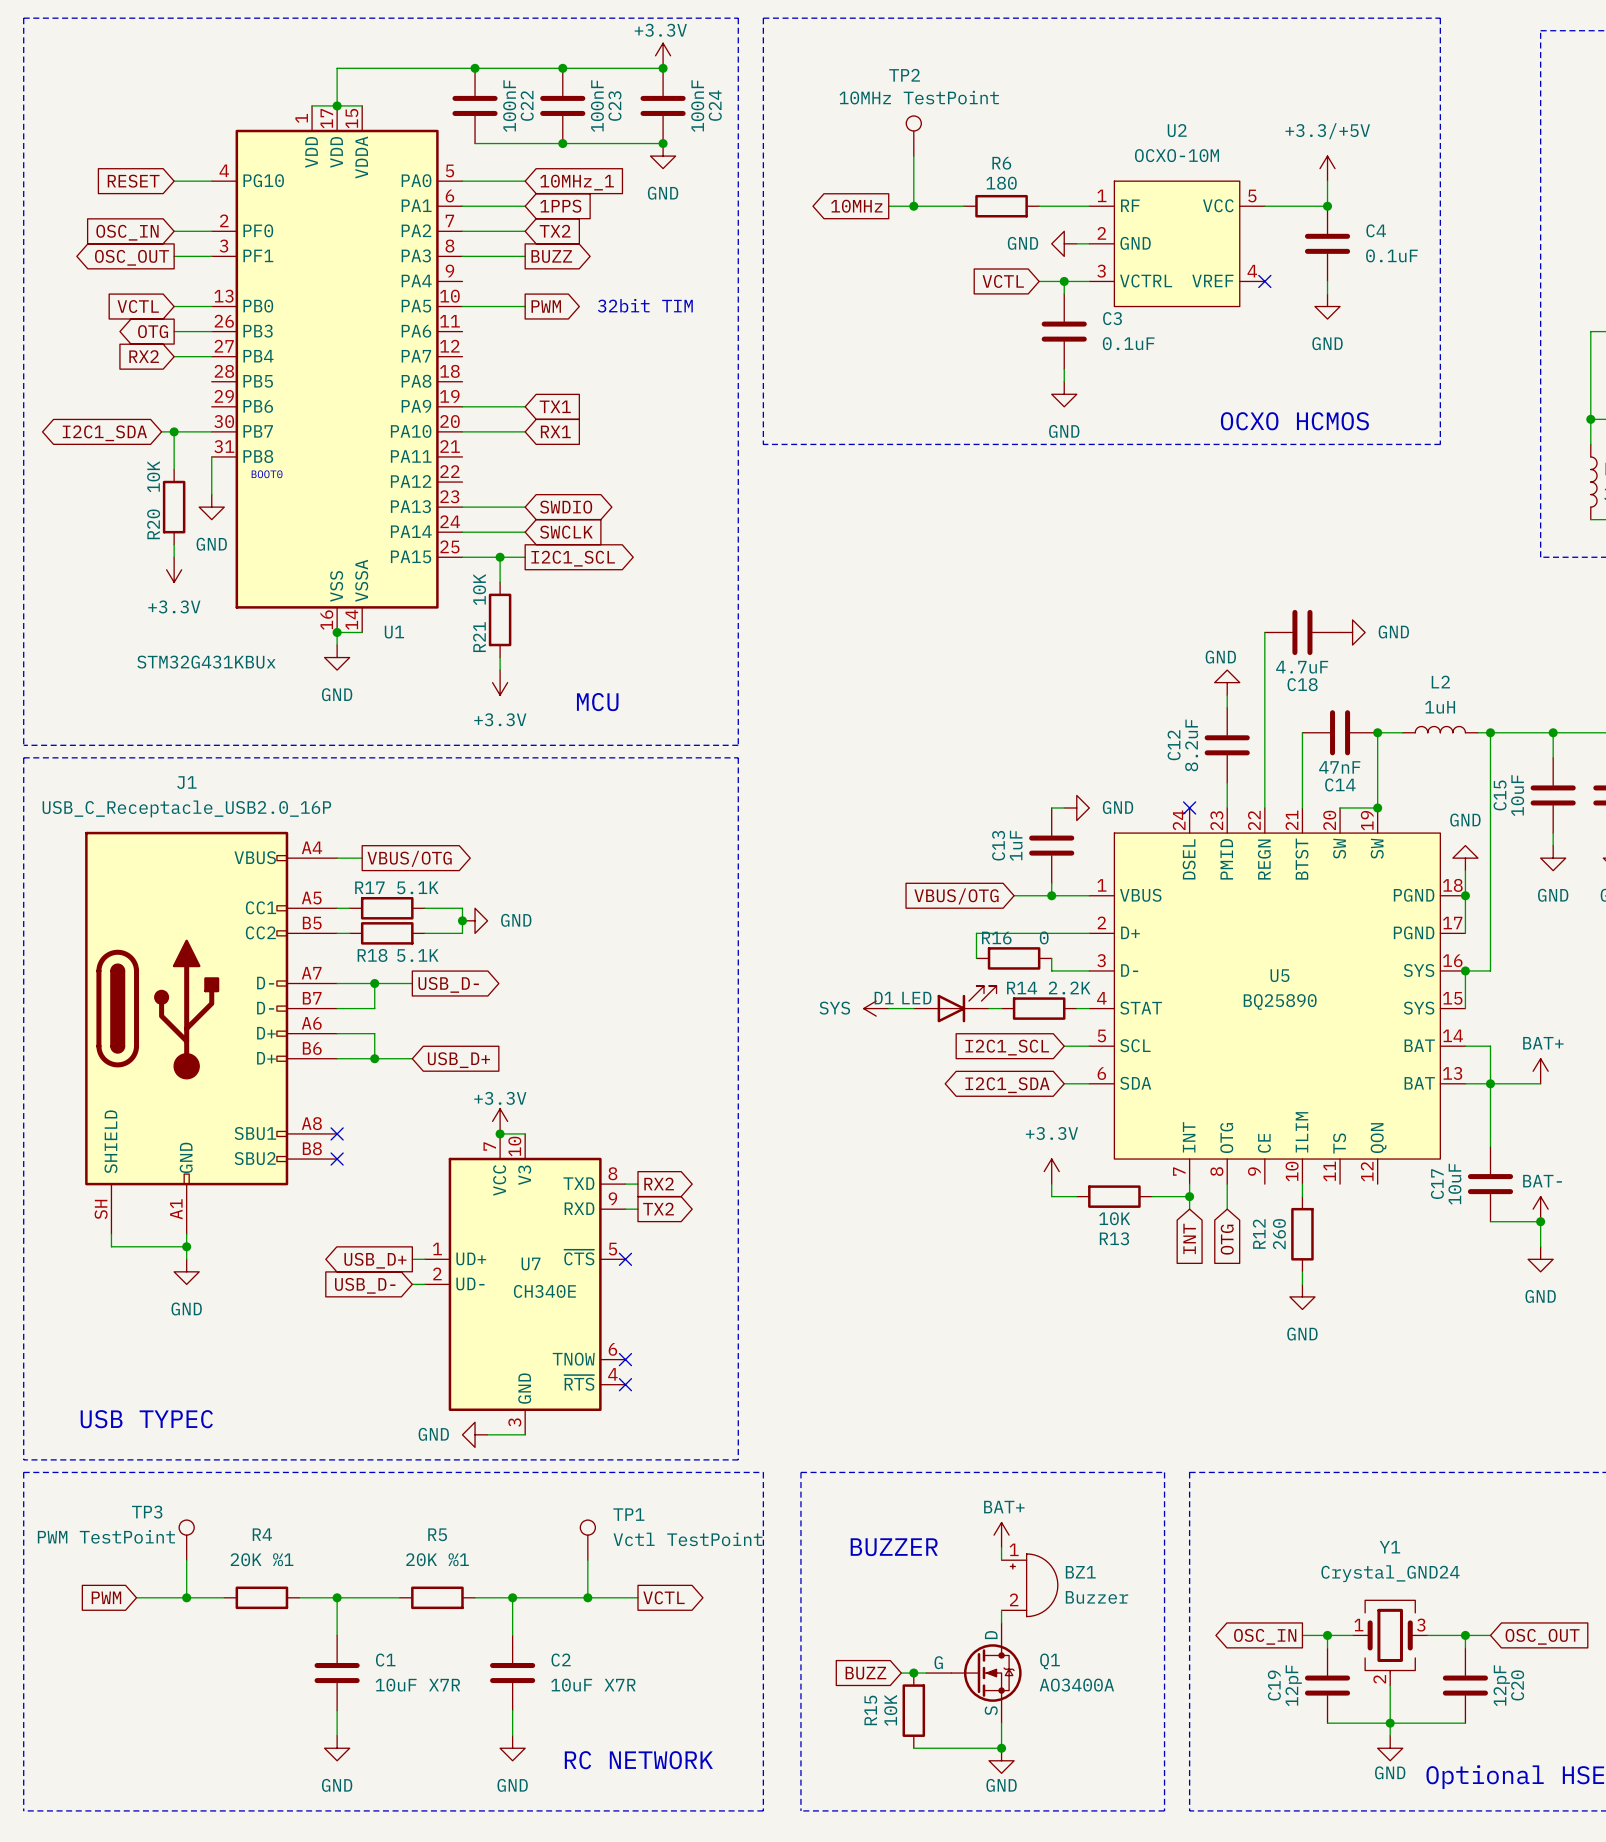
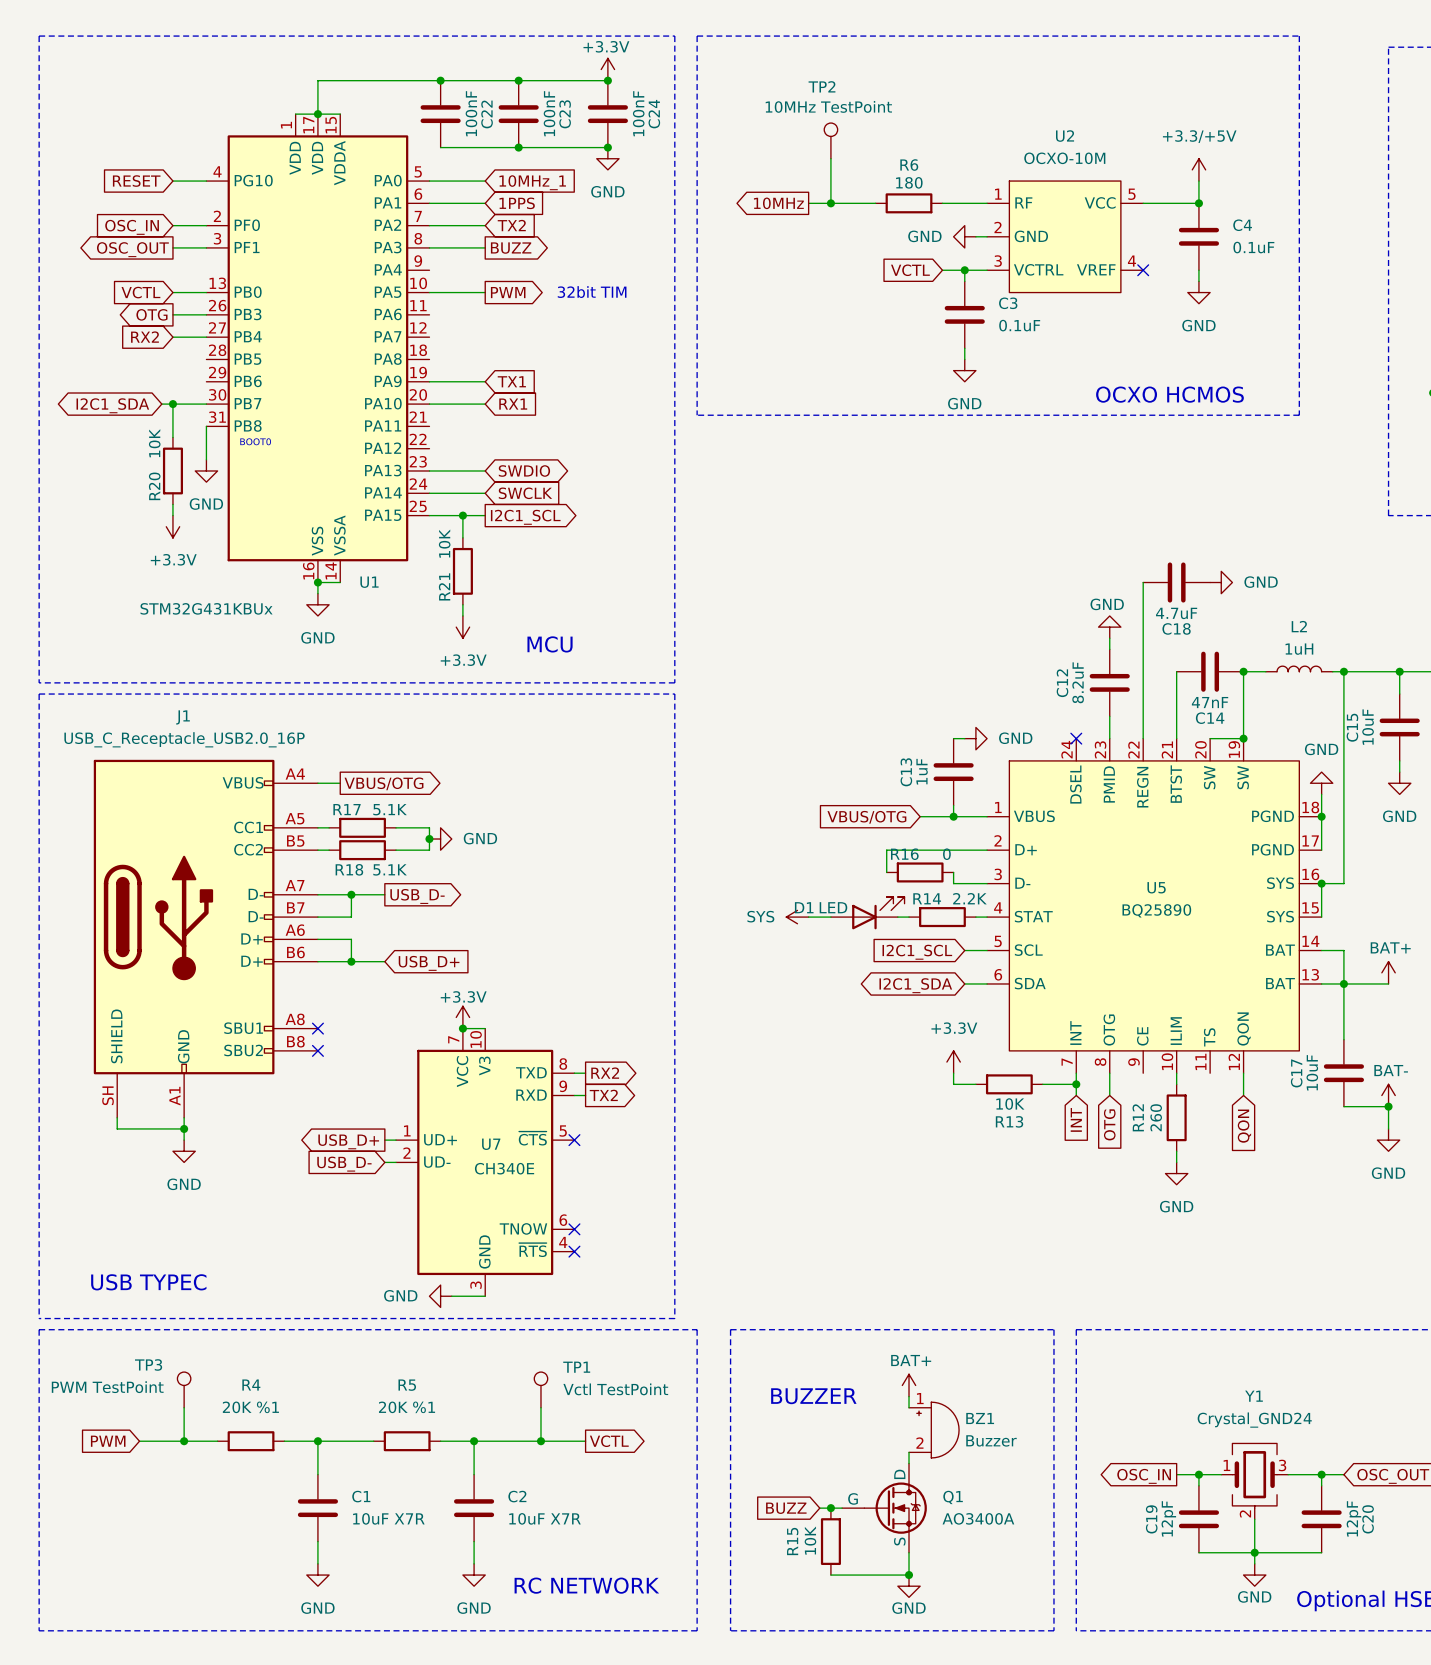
wire: none -> (1243, 1073) (1243, 1095)
global label: none -> QON (1244, 1126)

